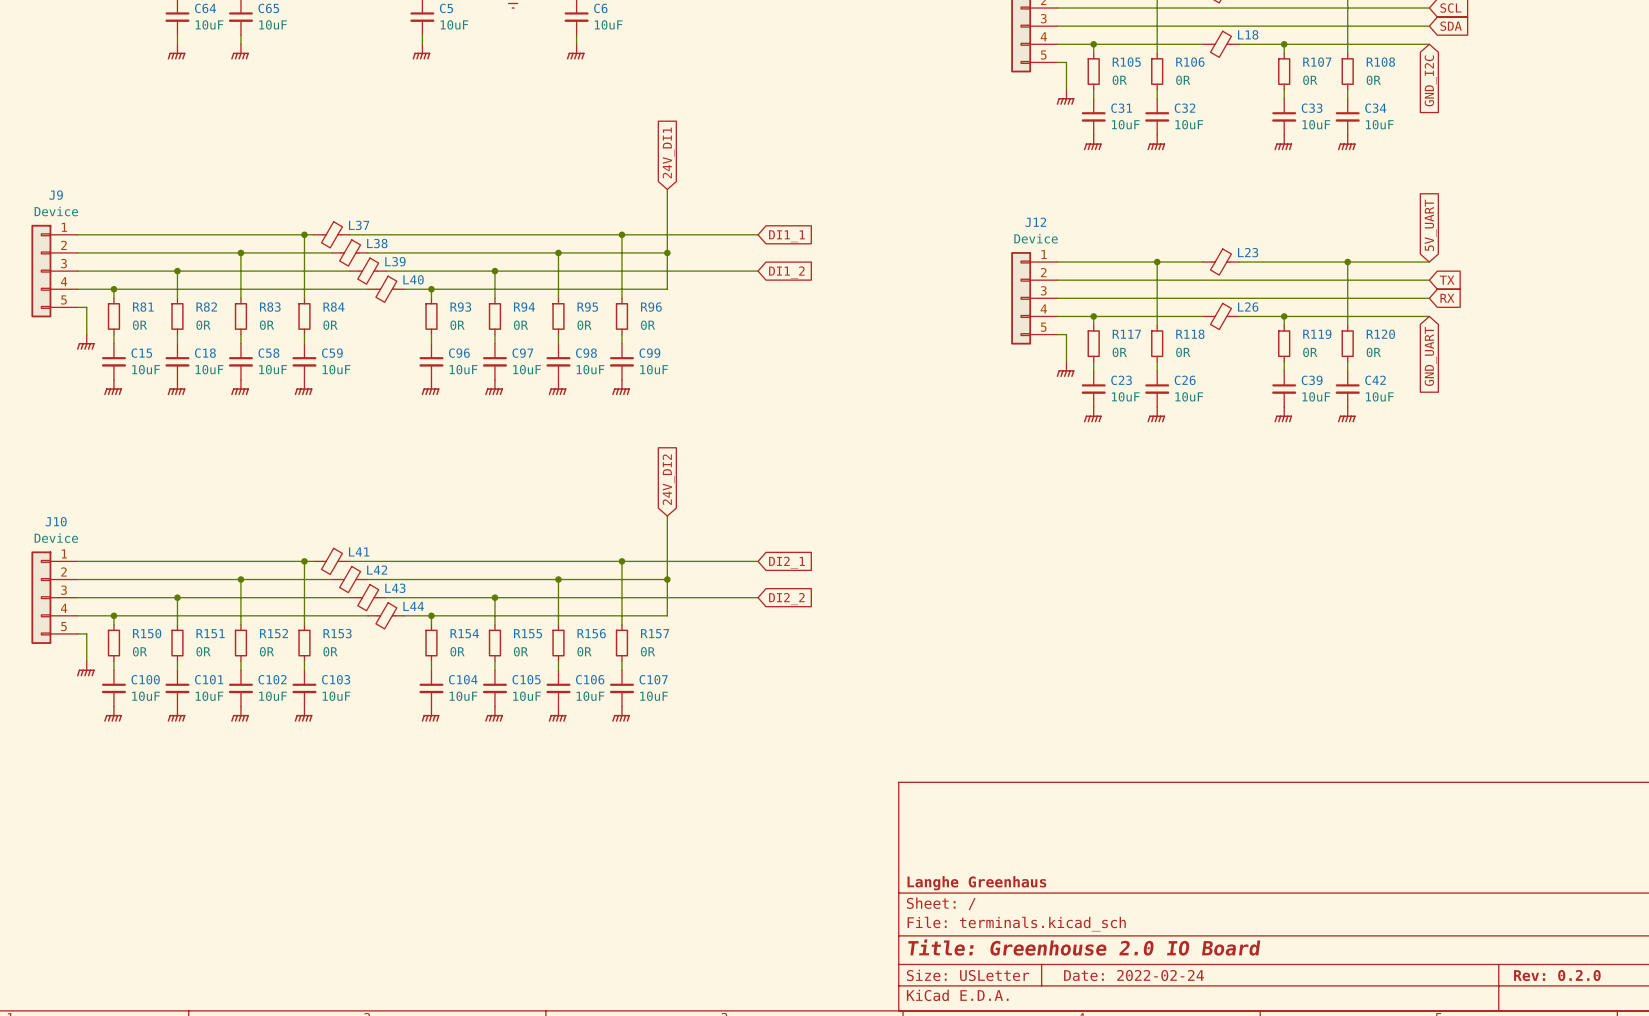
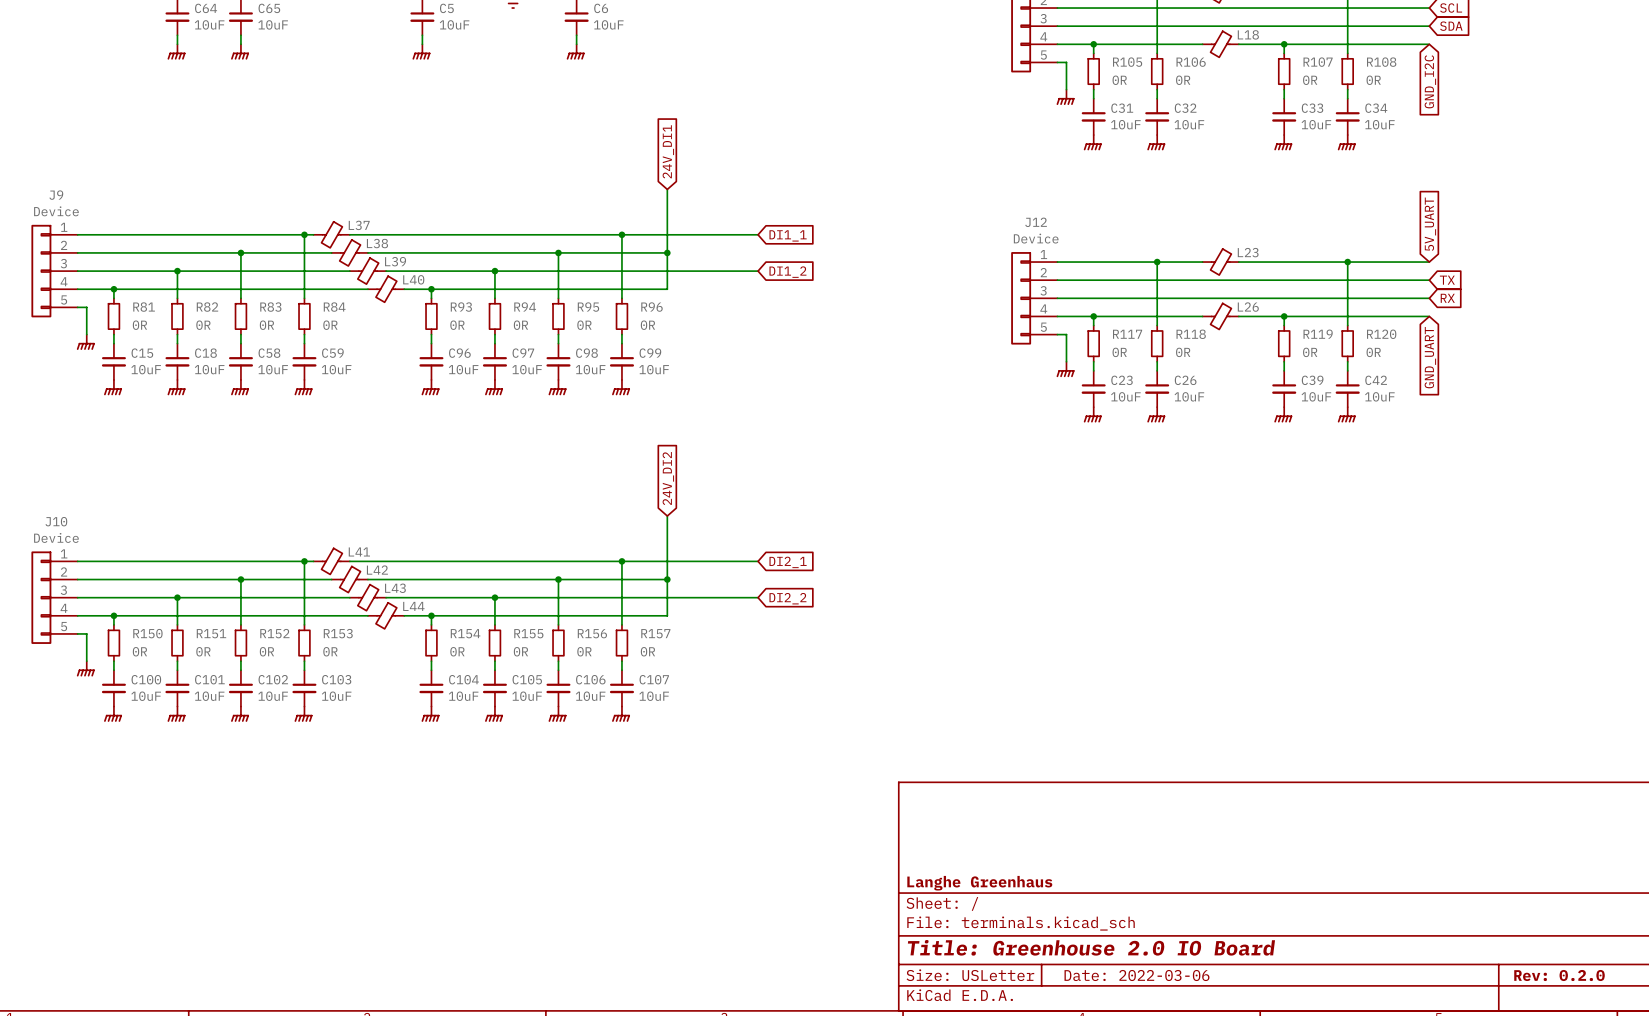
title block: Date: 2022-02-24 (1133, 975) -> Date: 2022-03-06 (1136, 975)

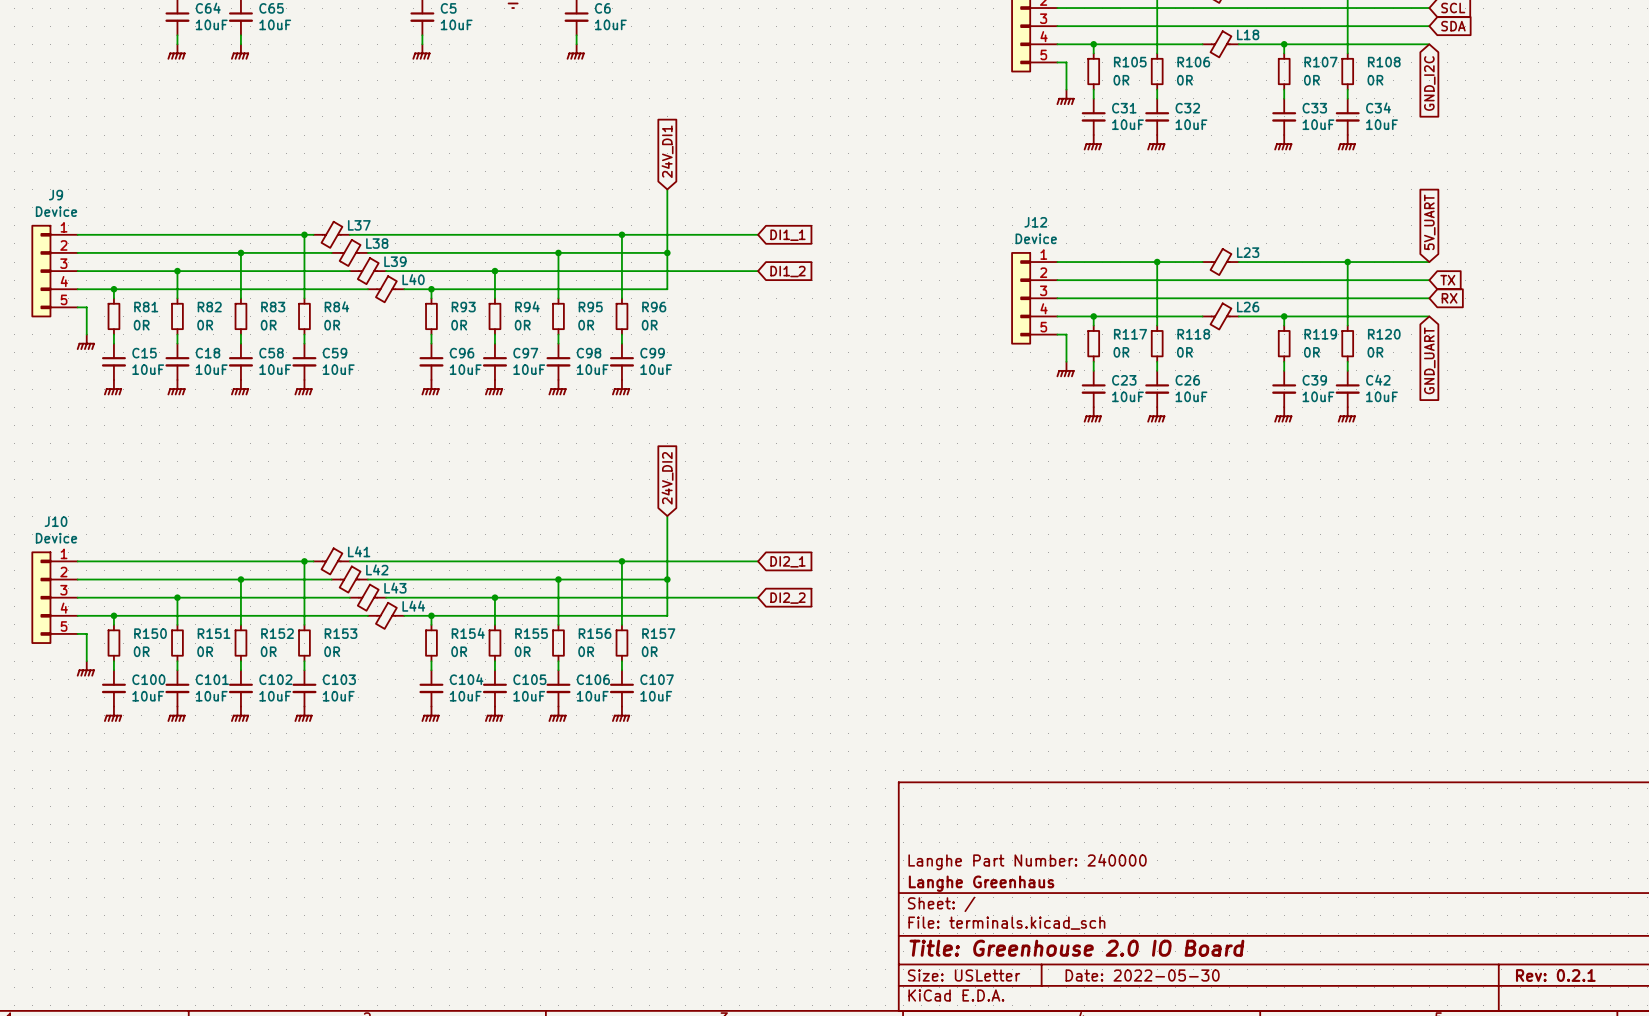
title block: none -> Langhe Part Number: 240000 (1027, 862)
title block: Date: 2022-03-06 (1136, 975) -> Date: 2022-05-30 (1142, 975)
title block: Rev: 0.2.0 (1559, 975) -> Rev: 0.2.1 (1555, 975)

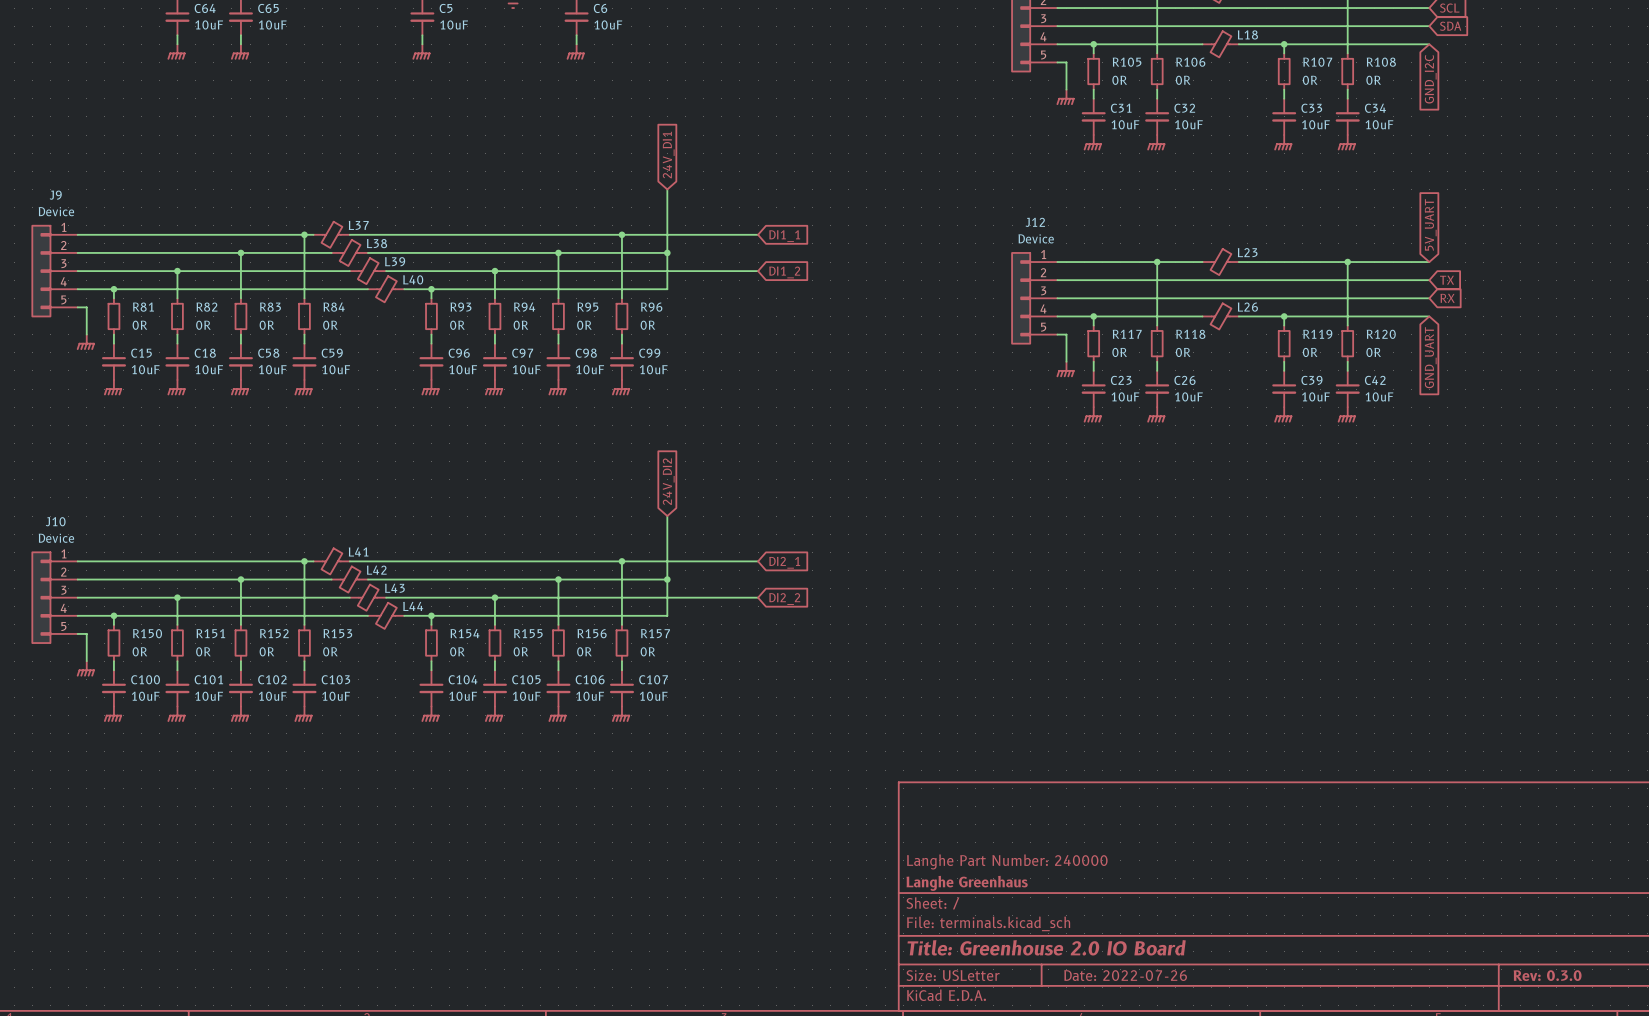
title block: Date: 2022-05-30 (1142, 975) -> Date: 2022-07-26 (1125, 975)
title block: Rev: 0.2.1 (1555, 975) -> Rev: 0.3.0 (1547, 975)

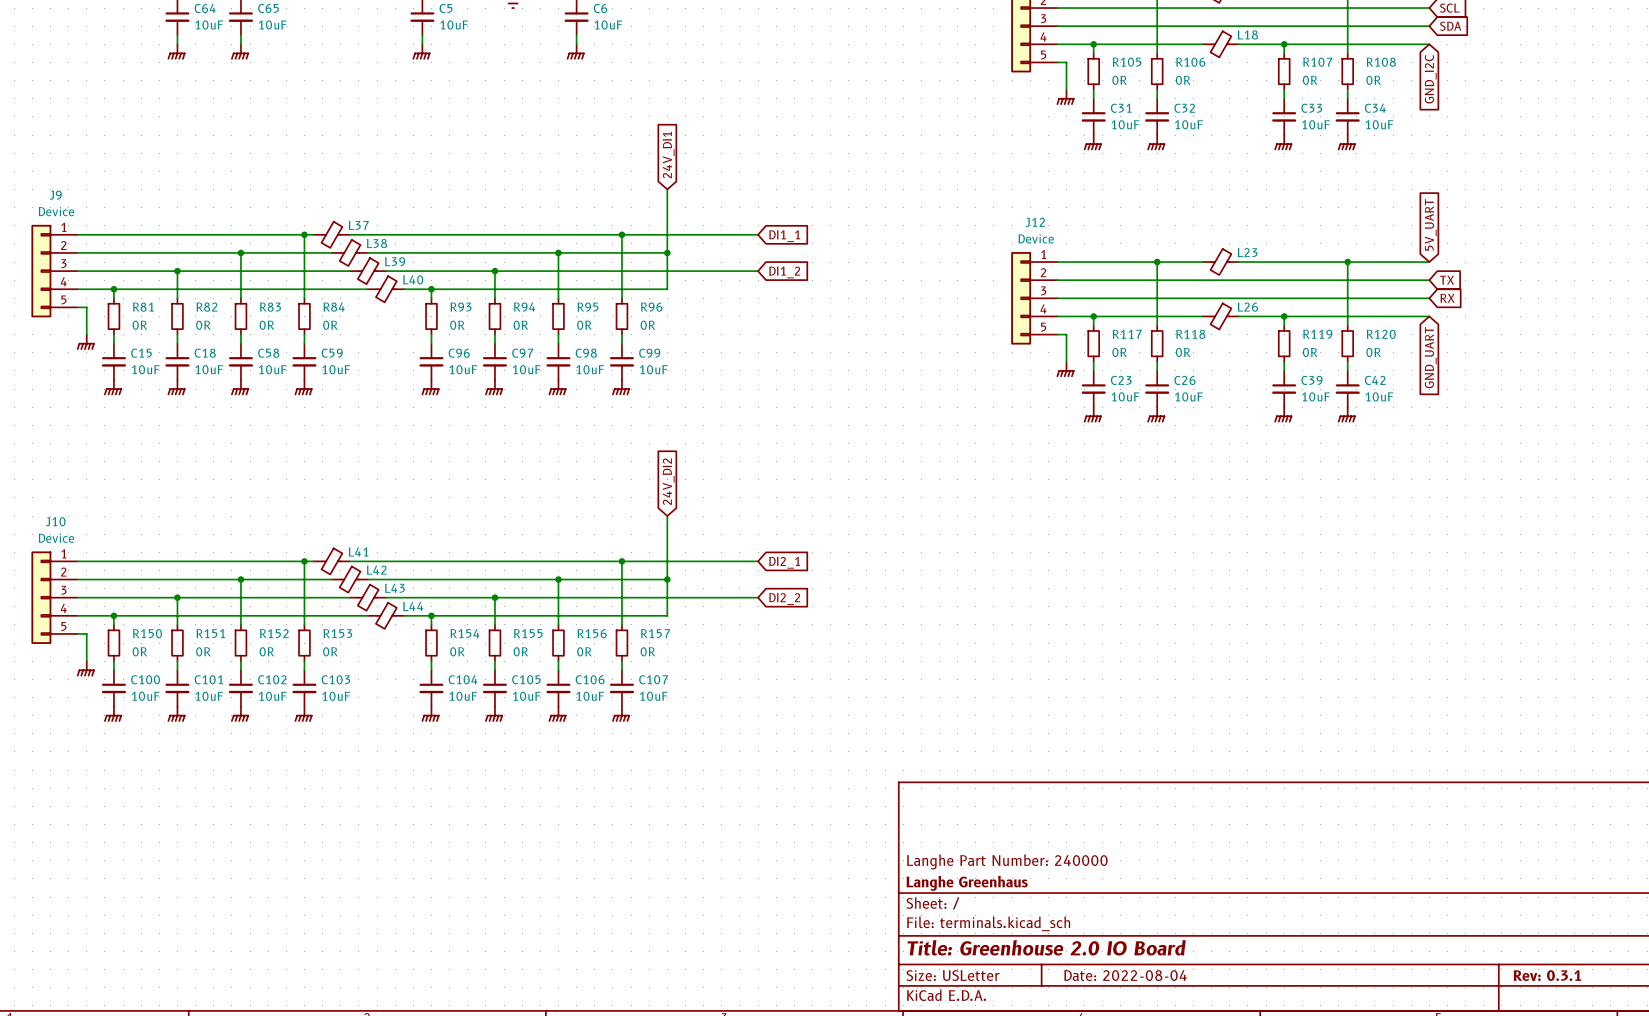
title block: Date: 2022-07-26 (1125, 975) -> Date: 2022-08-04 (1125, 975)
title block: Rev: 0.3.0 (1547, 975) -> Rev: 0.3.1 (1547, 975)

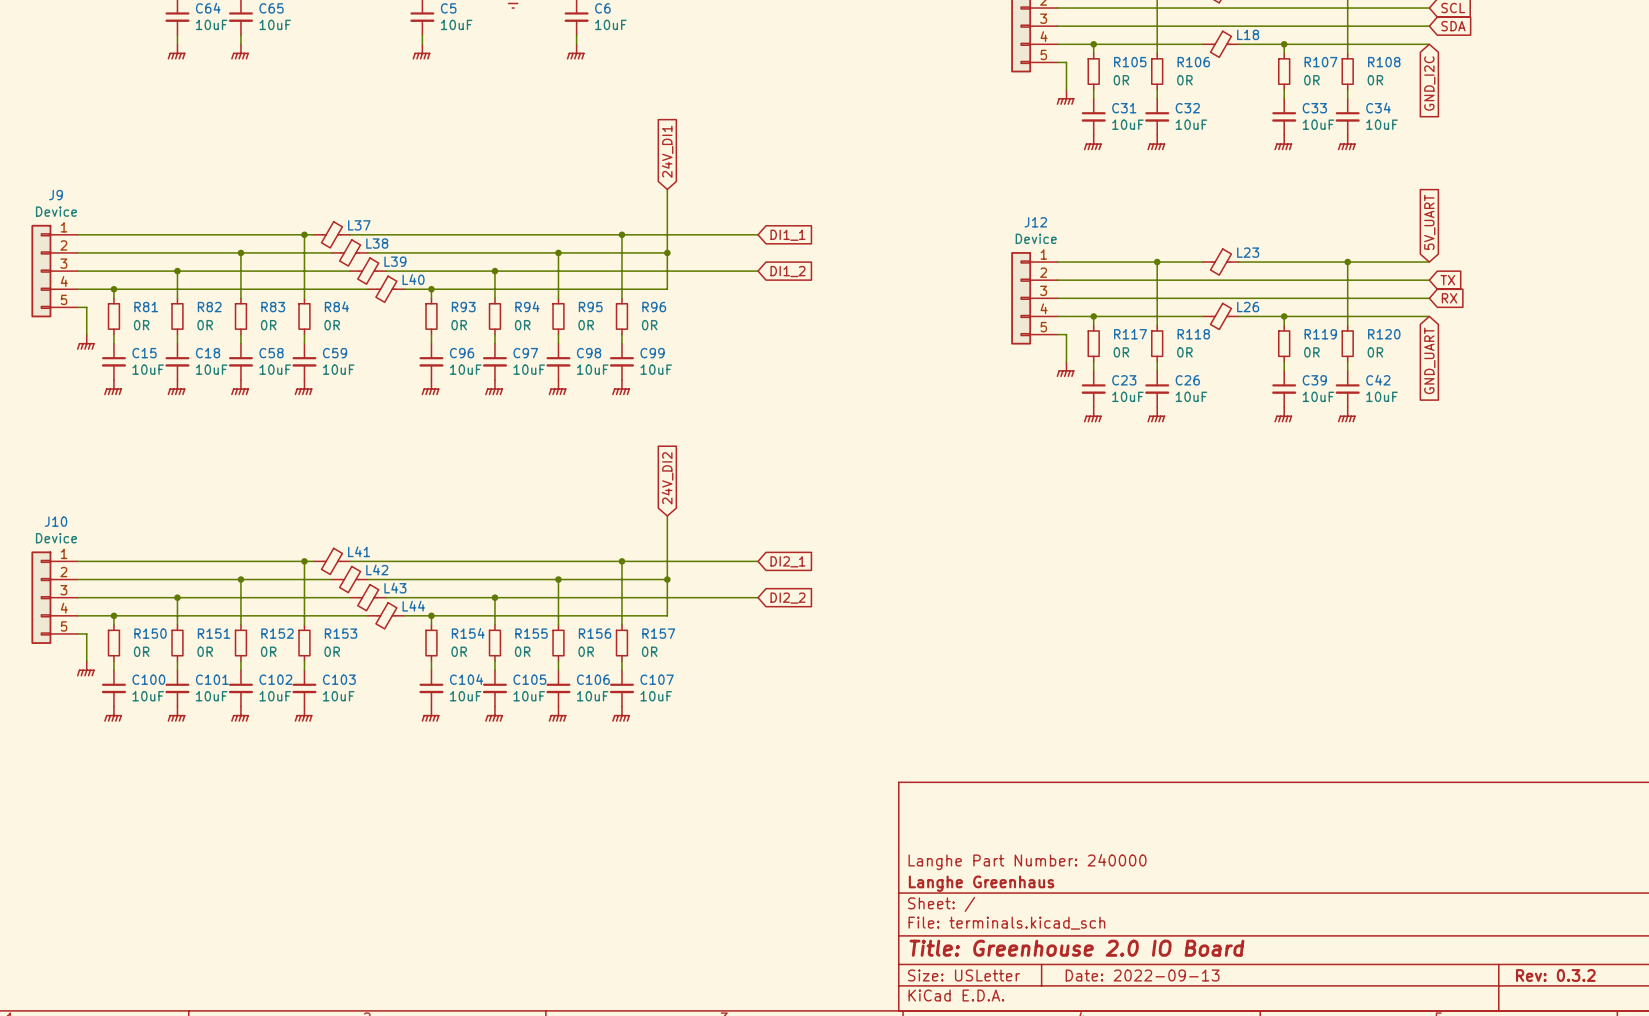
title block: Date: 2022-08-04 (1125, 975) -> Date: 2022-09-13 (1142, 975)
title block: Rev: 0.3.1 (1547, 975) -> Rev: 0.3.2 (1555, 975)

